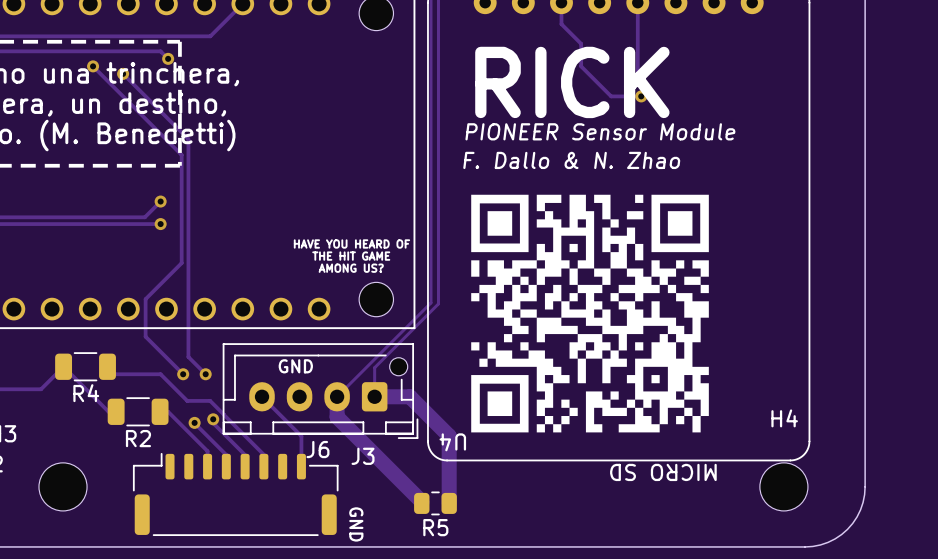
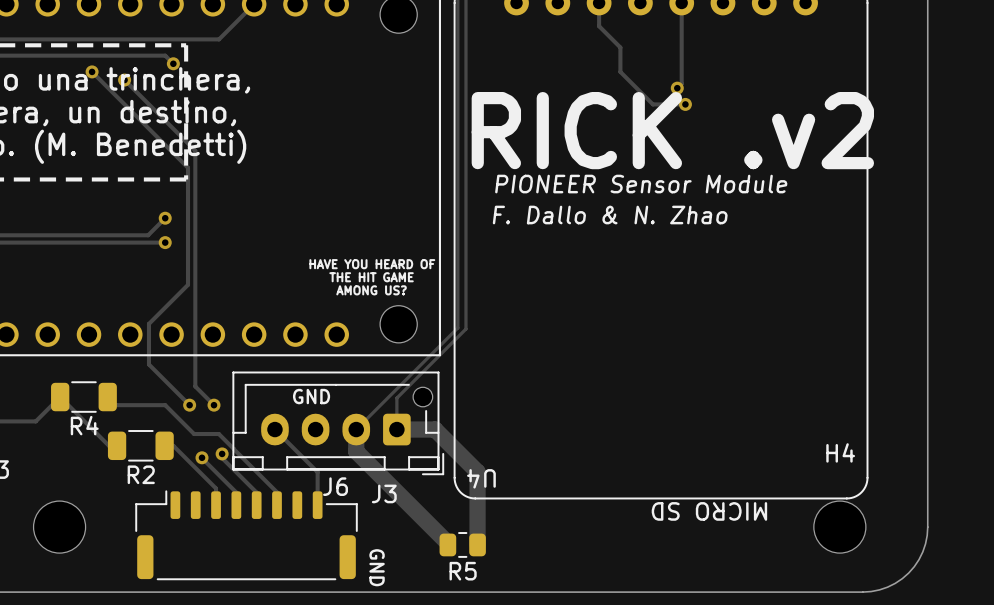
text: RICK (572, 82) -> RICK .v2 (672, 130)
text position: PIONEER Sensor Module (600, 131) -> PIONEER Sensor Module (641, 184)
text position: F. Dallo & N. Zhao (571, 160) -> F. Dallo & N. Zhao (610, 215)
drawing: [471, 194, 709, 433] -> none

